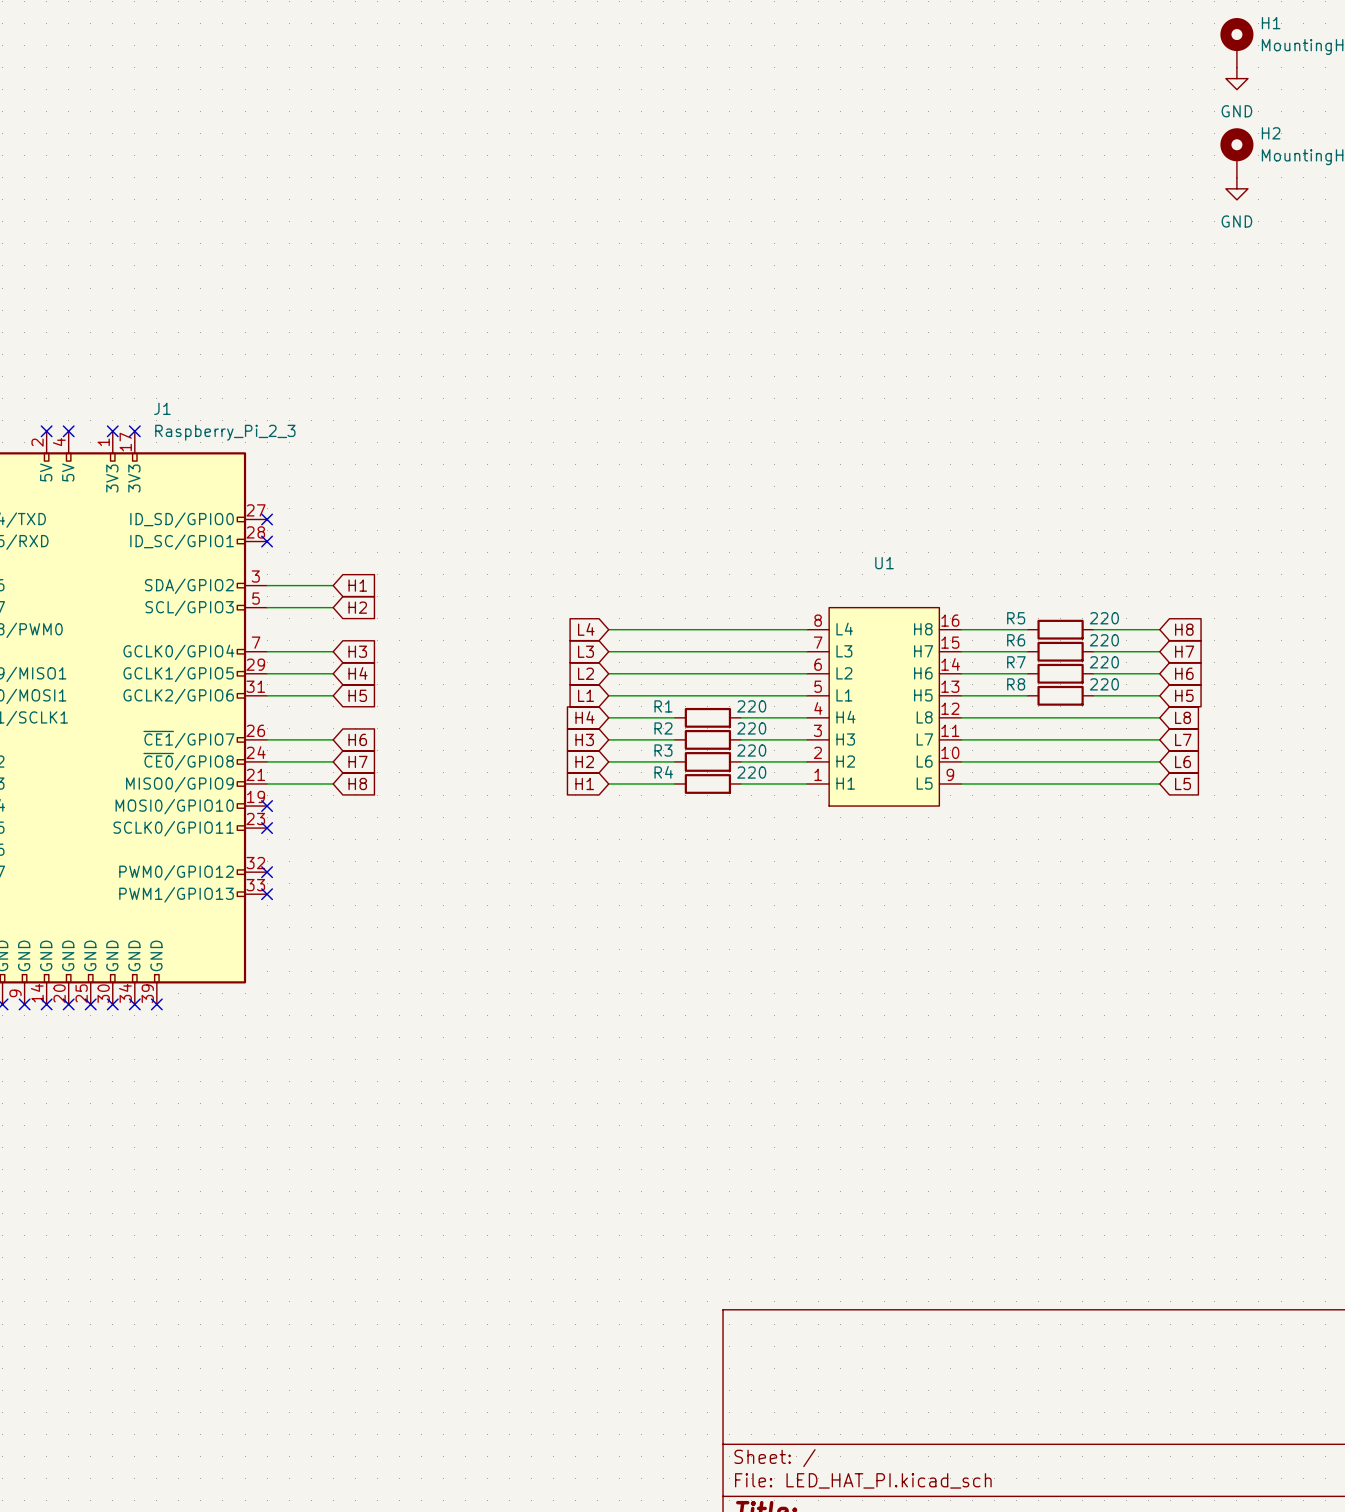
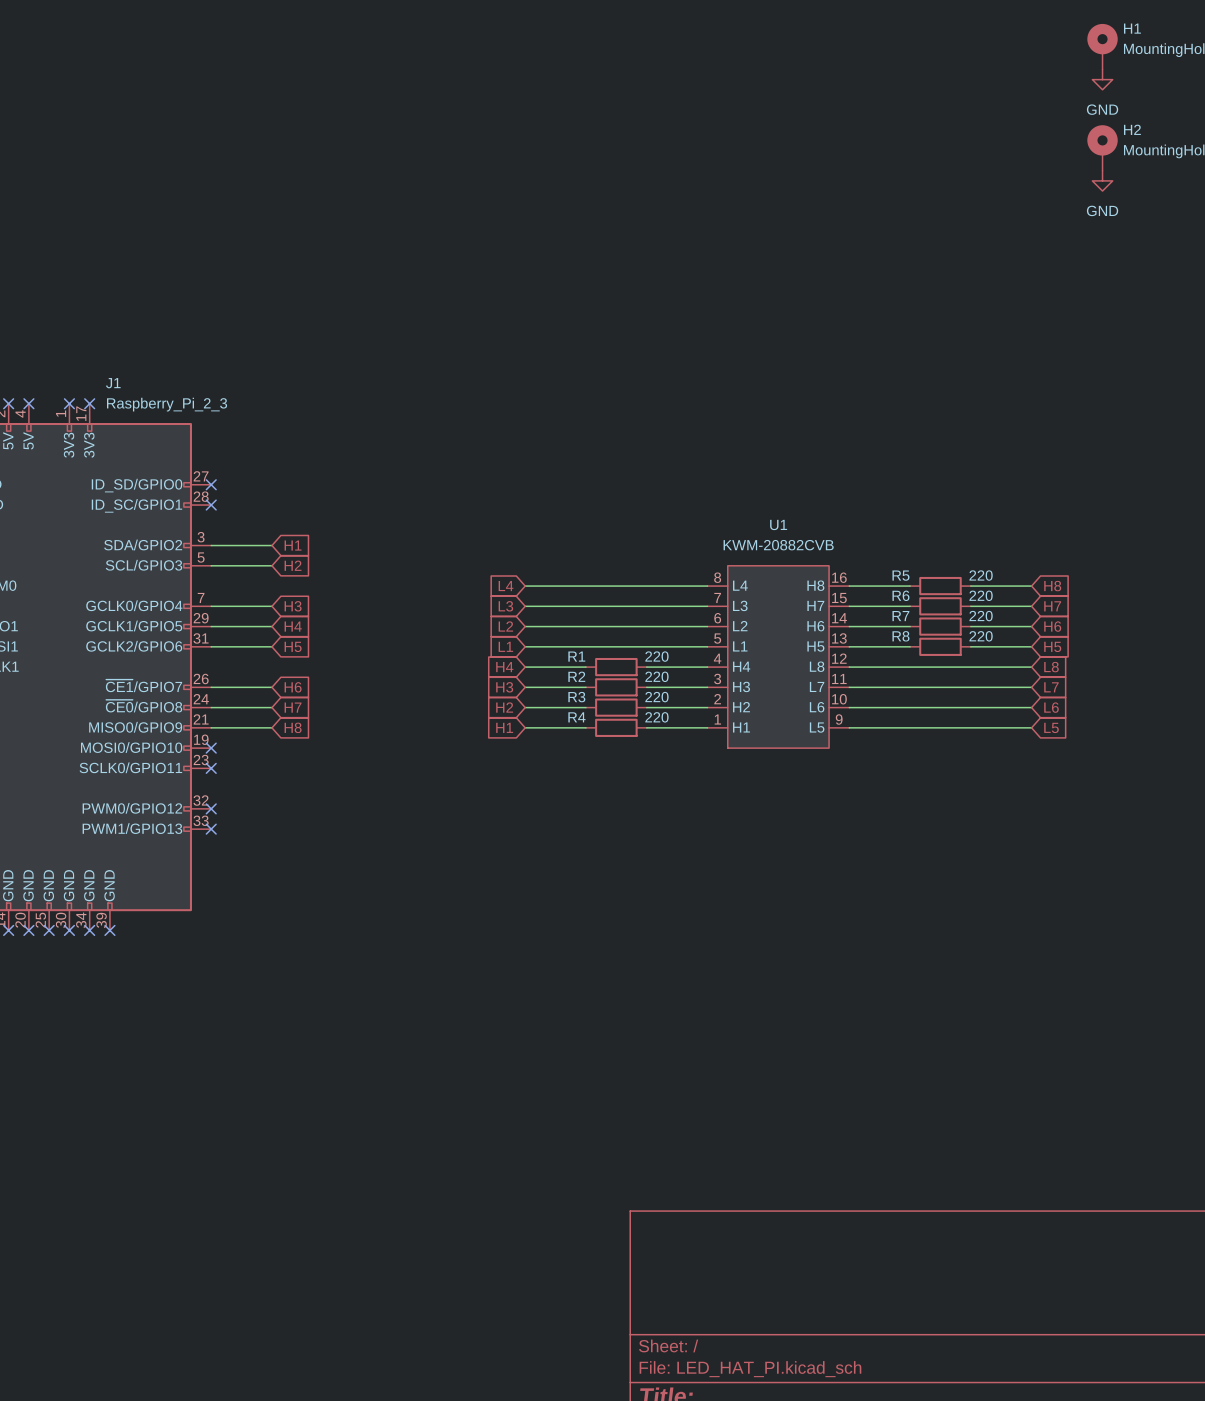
U1 value: none -> KWM-20882CVB (778, 545)

